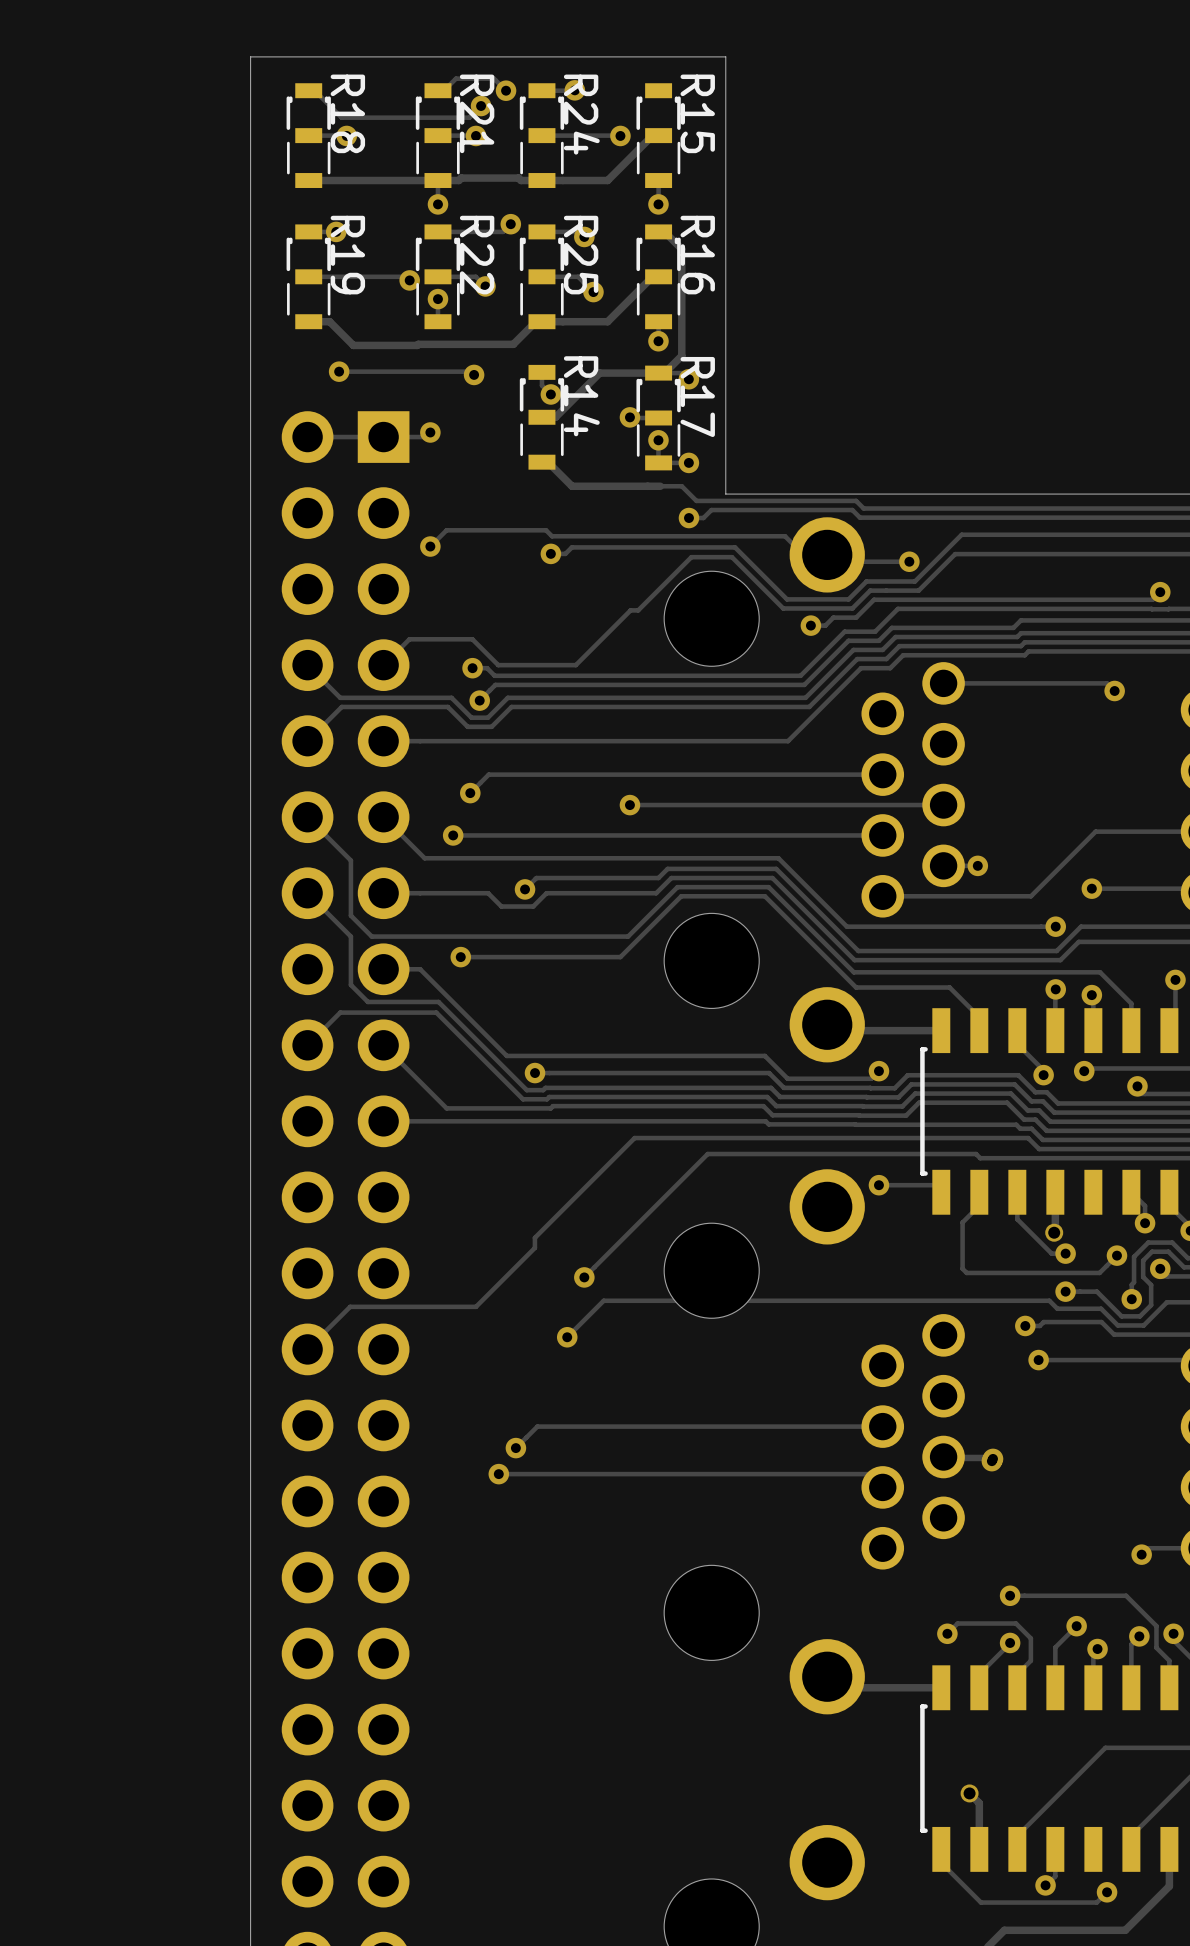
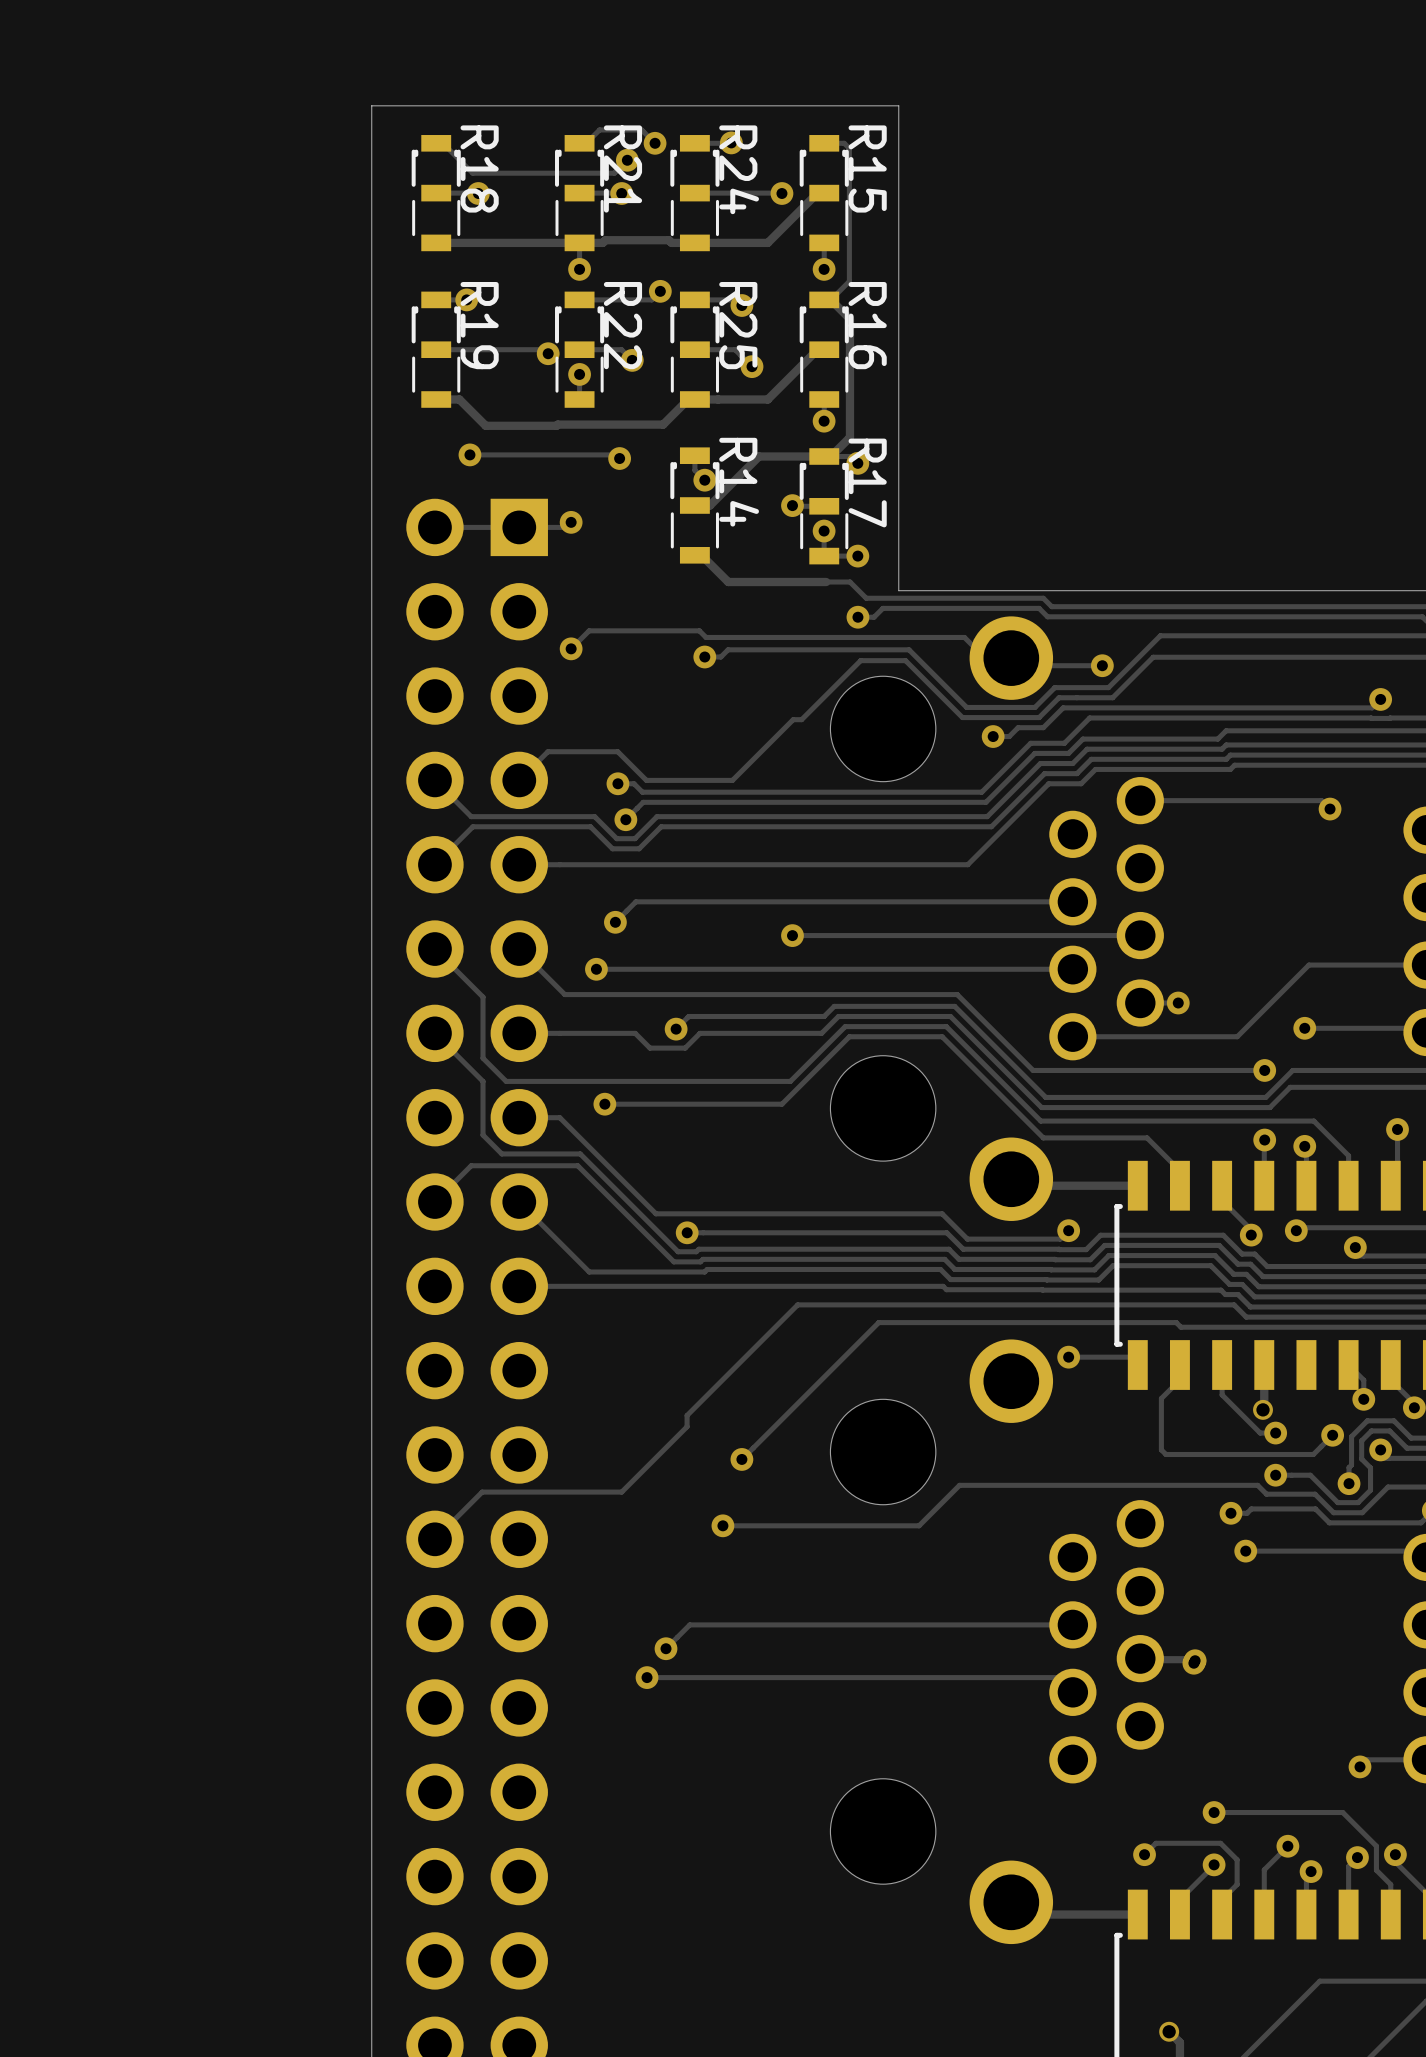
track: none -> (824, 143) (844, 143) (849, 148) (849, 281) (830, 299)
track: (780, 1300) (603, 1300) (567, 1337) -> (959, 1485) (919, 1525) (722, 1525)

